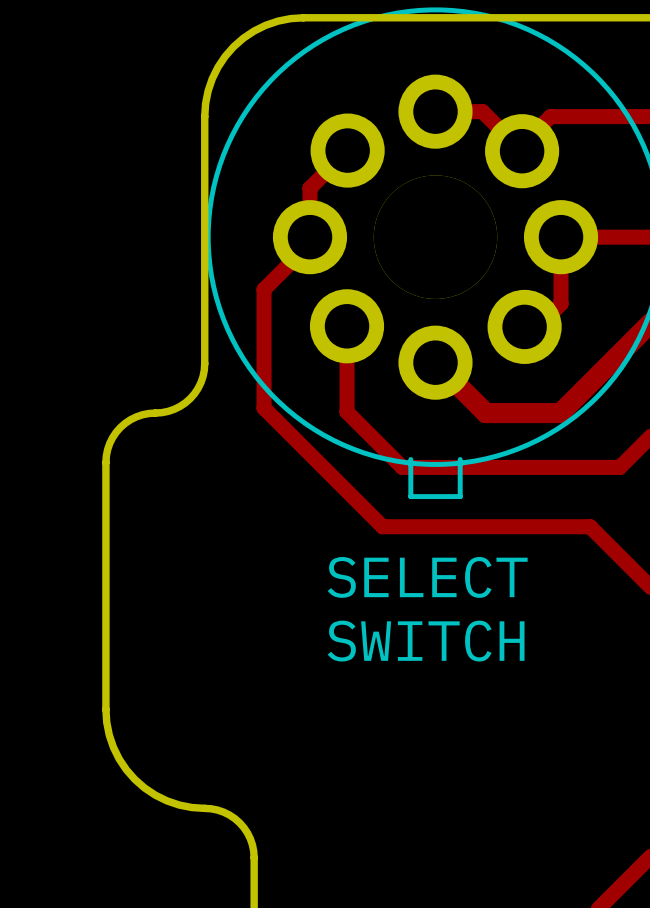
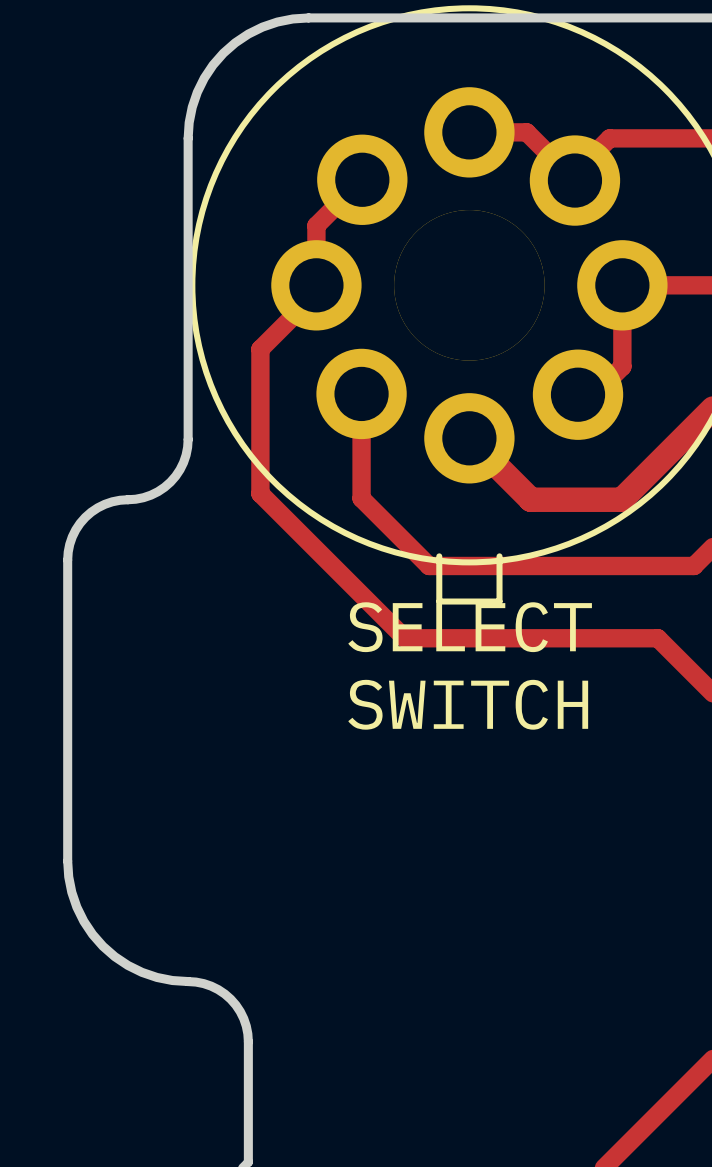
text position: SELECT (427, 577) -> SELECT (470, 627)
text position: SWITCH (426, 641) -> SWITCH (468, 704)

